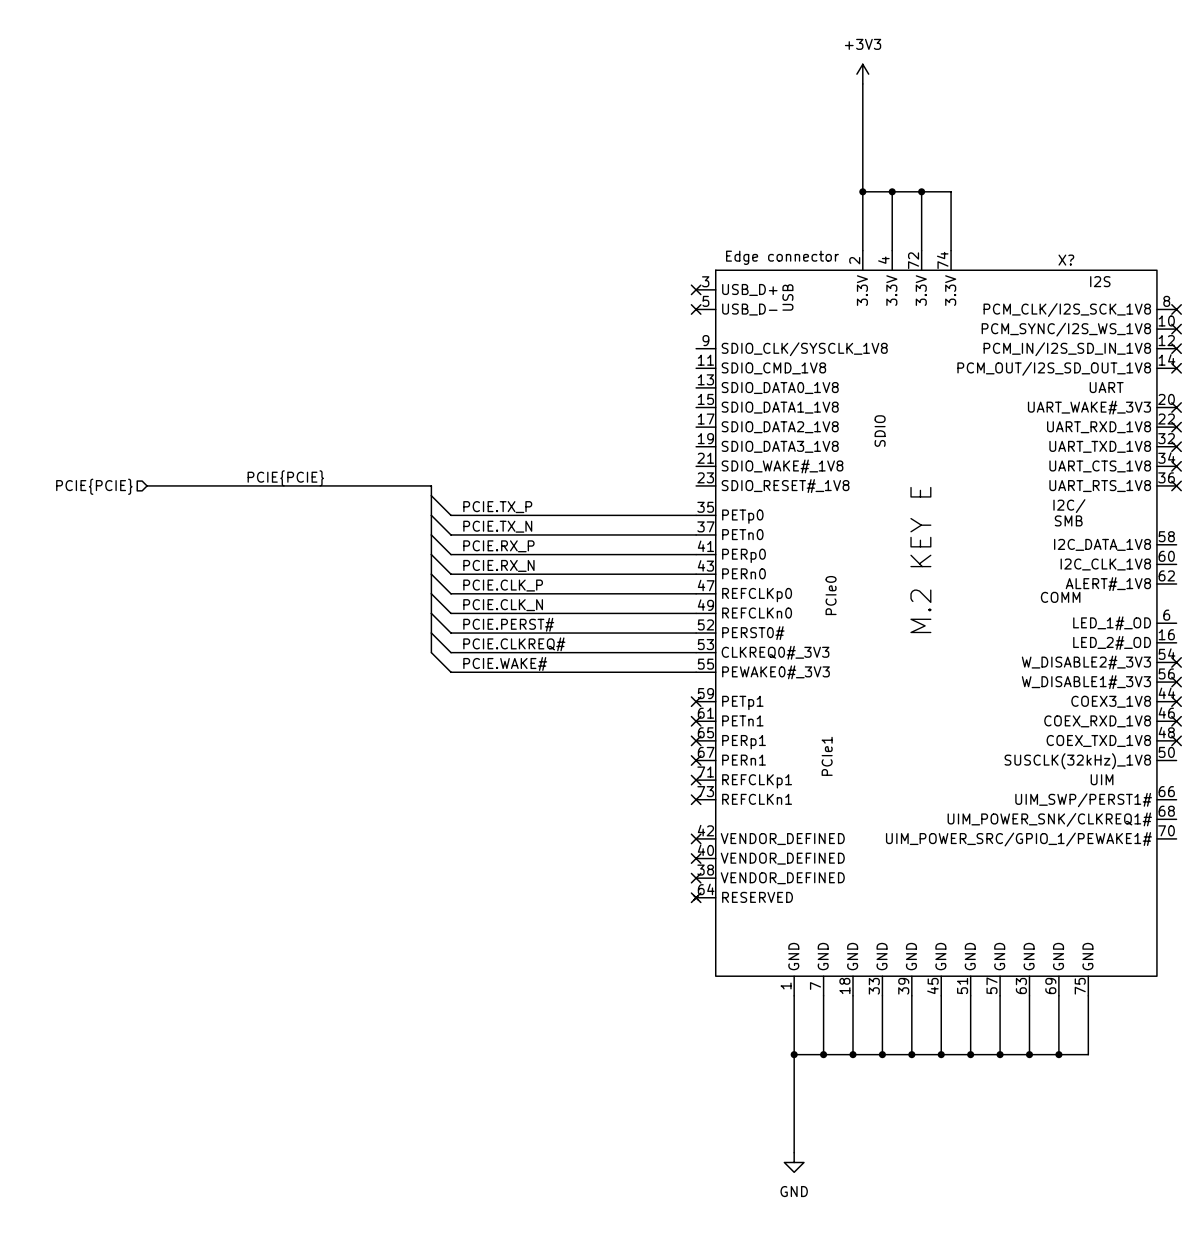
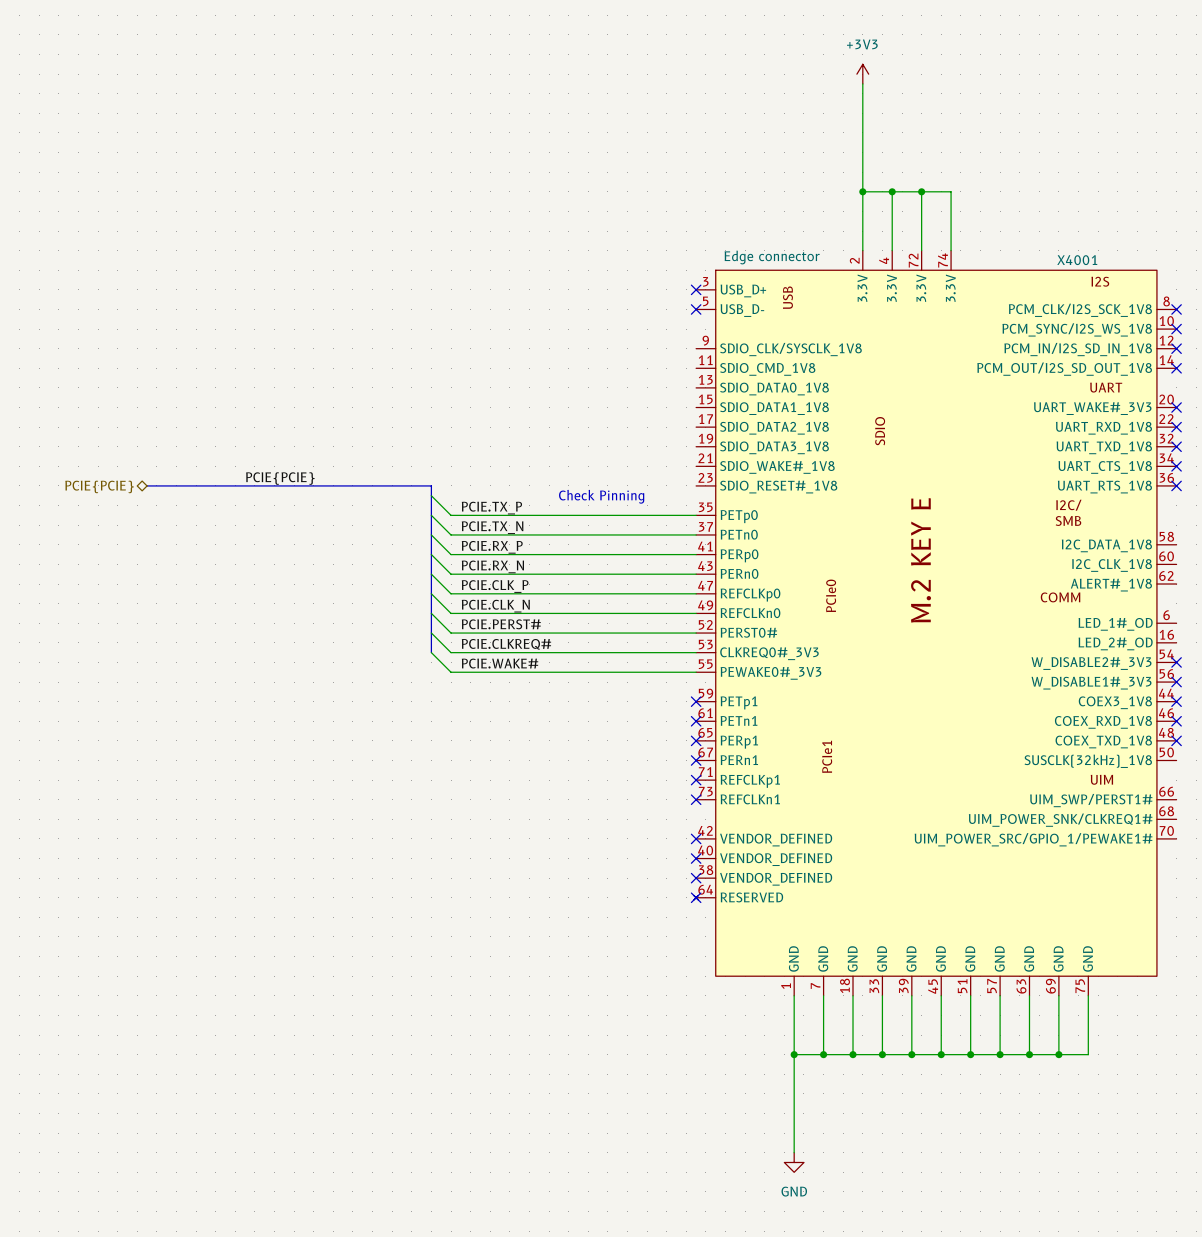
X? name: X? (1066, 260) -> X4001 (1077, 260)
hierarchical label shape: input (94, 486) -> bidirectional (99, 486)
text: none -> Check Pinning (601, 496)

